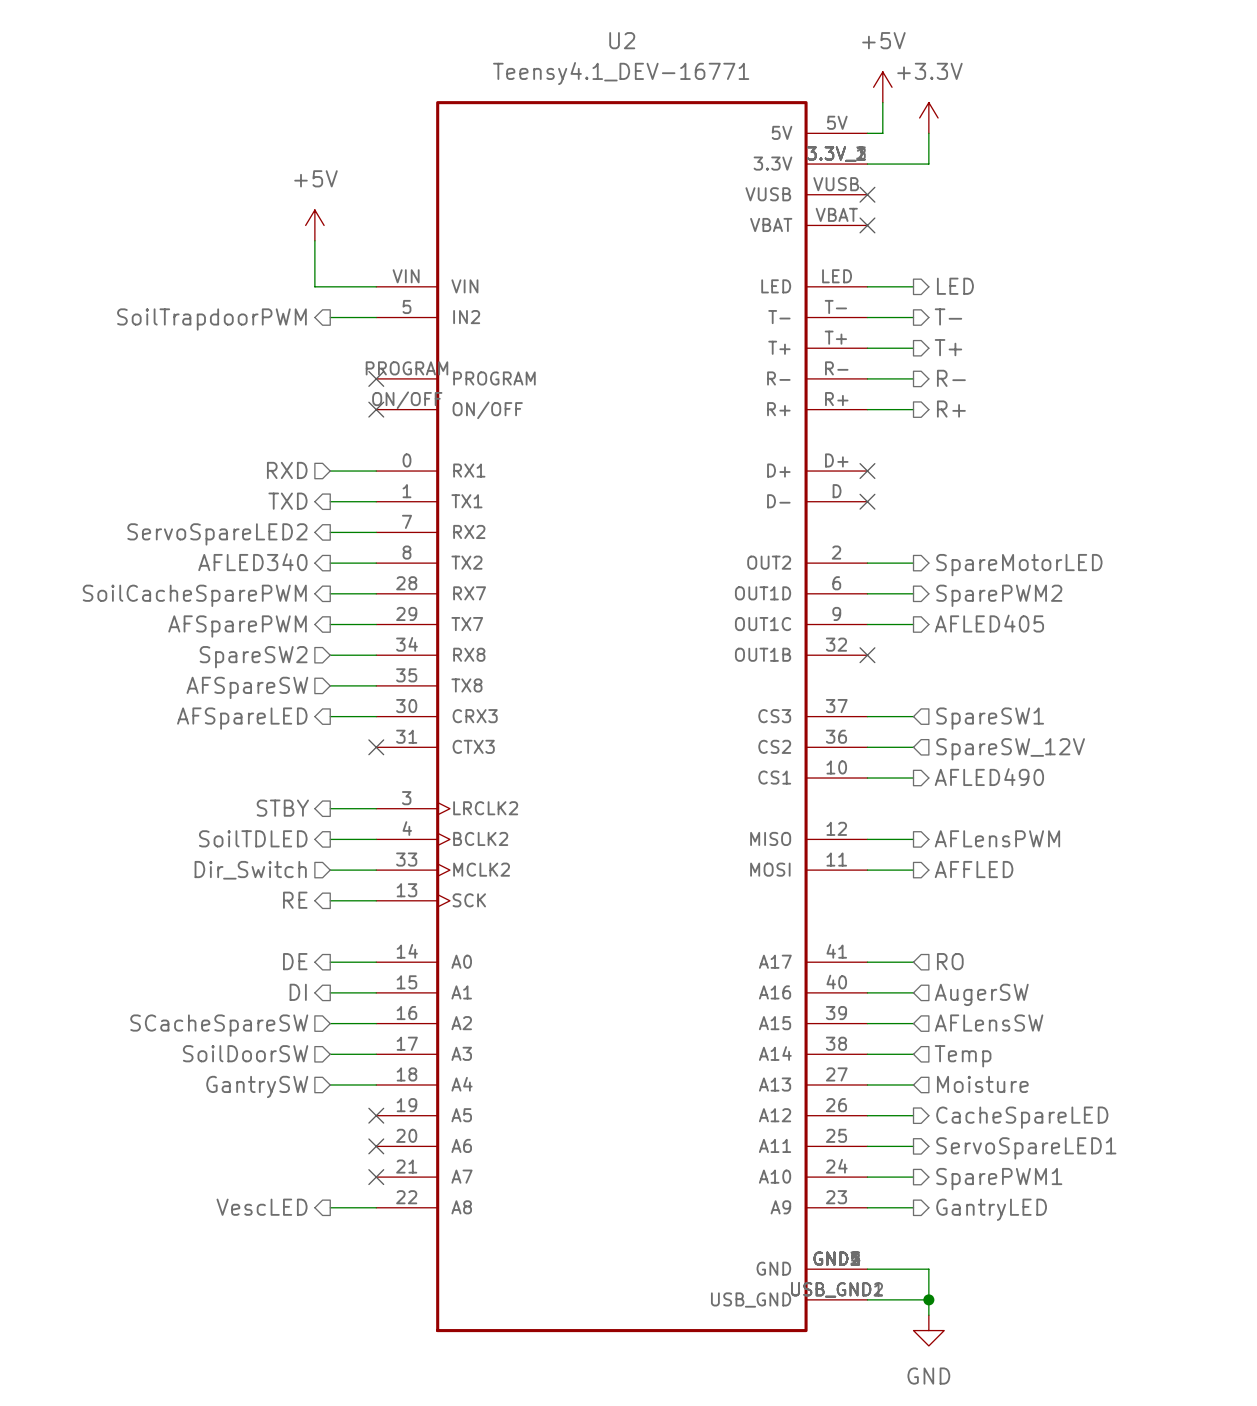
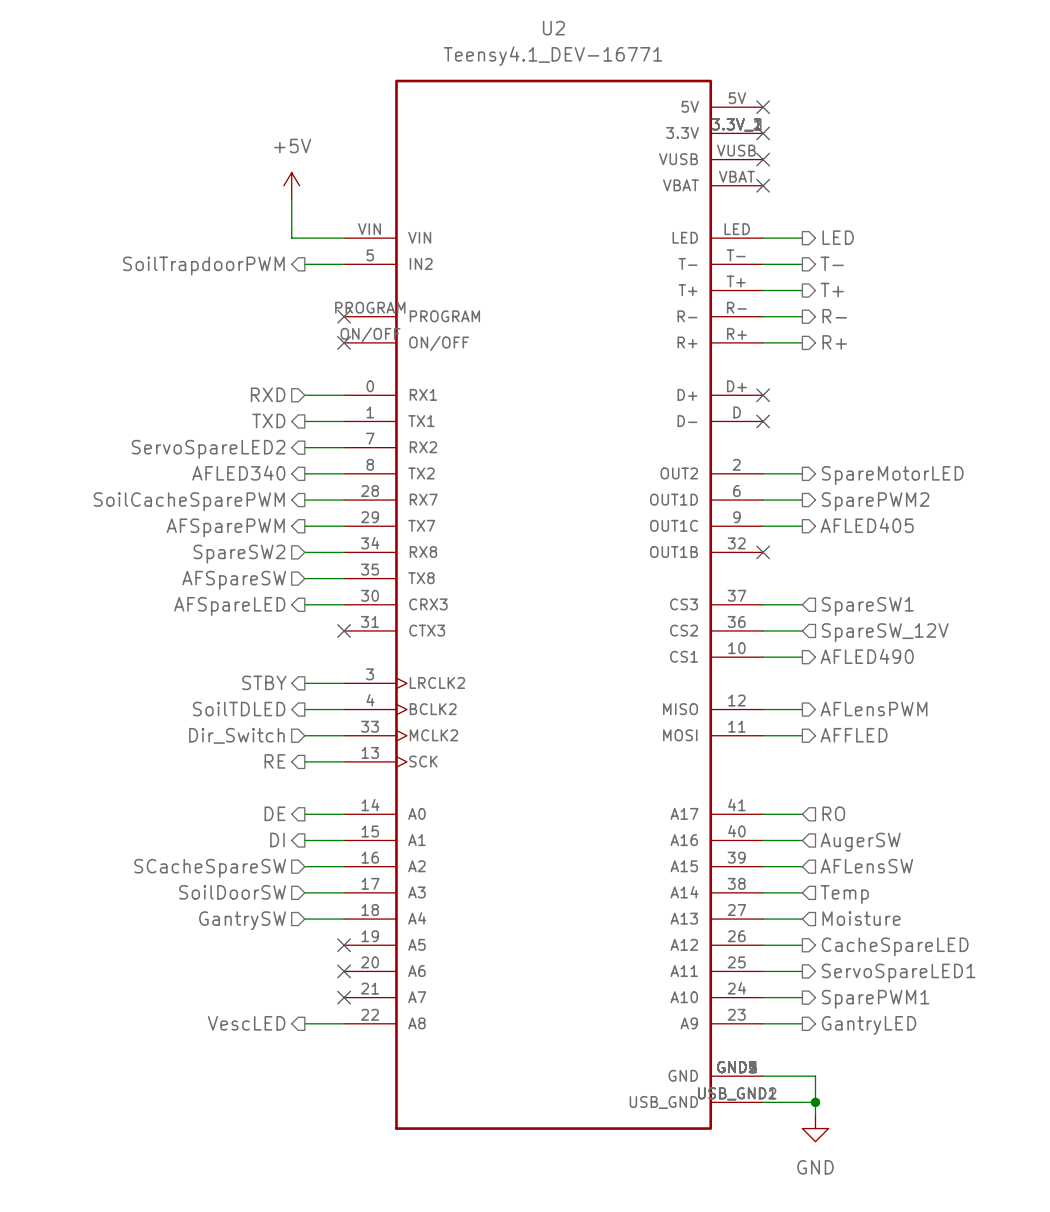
power symbol: +5V (882, 87) -> none
wire: (882, 102) (882, 133) (867, 133) -> none
power symbol: +3.3V (928, 117) -> none
no-connect mark: none -> (763, 107)
wire: (928, 133) (928, 164) (867, 164) -> none
no-connect mark: none -> (763, 133)

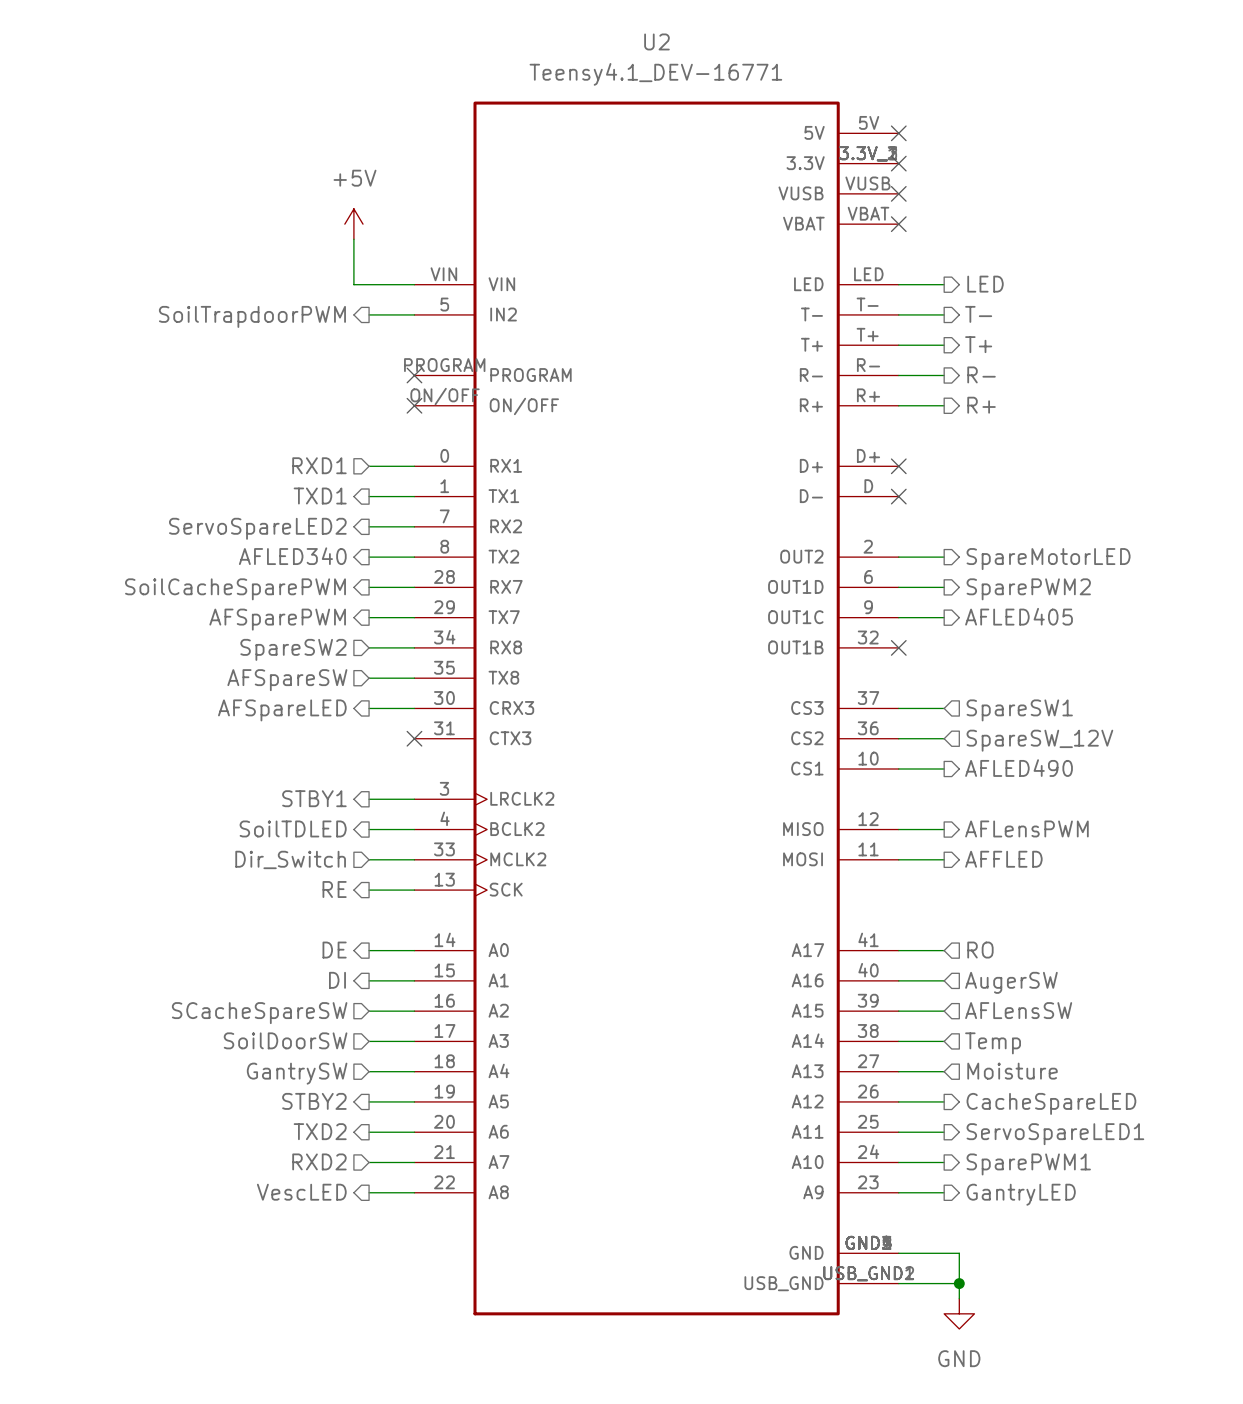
hierarchical label: RXD (268, 394) -> RXD1 (319, 465)
hierarchical label: TXD (268, 420) -> TXD1 (320, 496)
hierarchical label: STBY (264, 682) -> STBY1 (314, 798)
hierarchical label: none -> STBY2 (314, 1101)
wire: none -> (369, 1101) (414, 1101)
no-connect mark: (344, 945) -> none
hierarchical label: none -> TXD2 (320, 1131)
wire: none -> (369, 1132) (414, 1132)
no-connect mark: (344, 971) -> none
hierarchical label: none -> RXD2 (319, 1161)
wire: none -> (369, 1162) (414, 1162)
no-connect mark: (344, 997) -> none

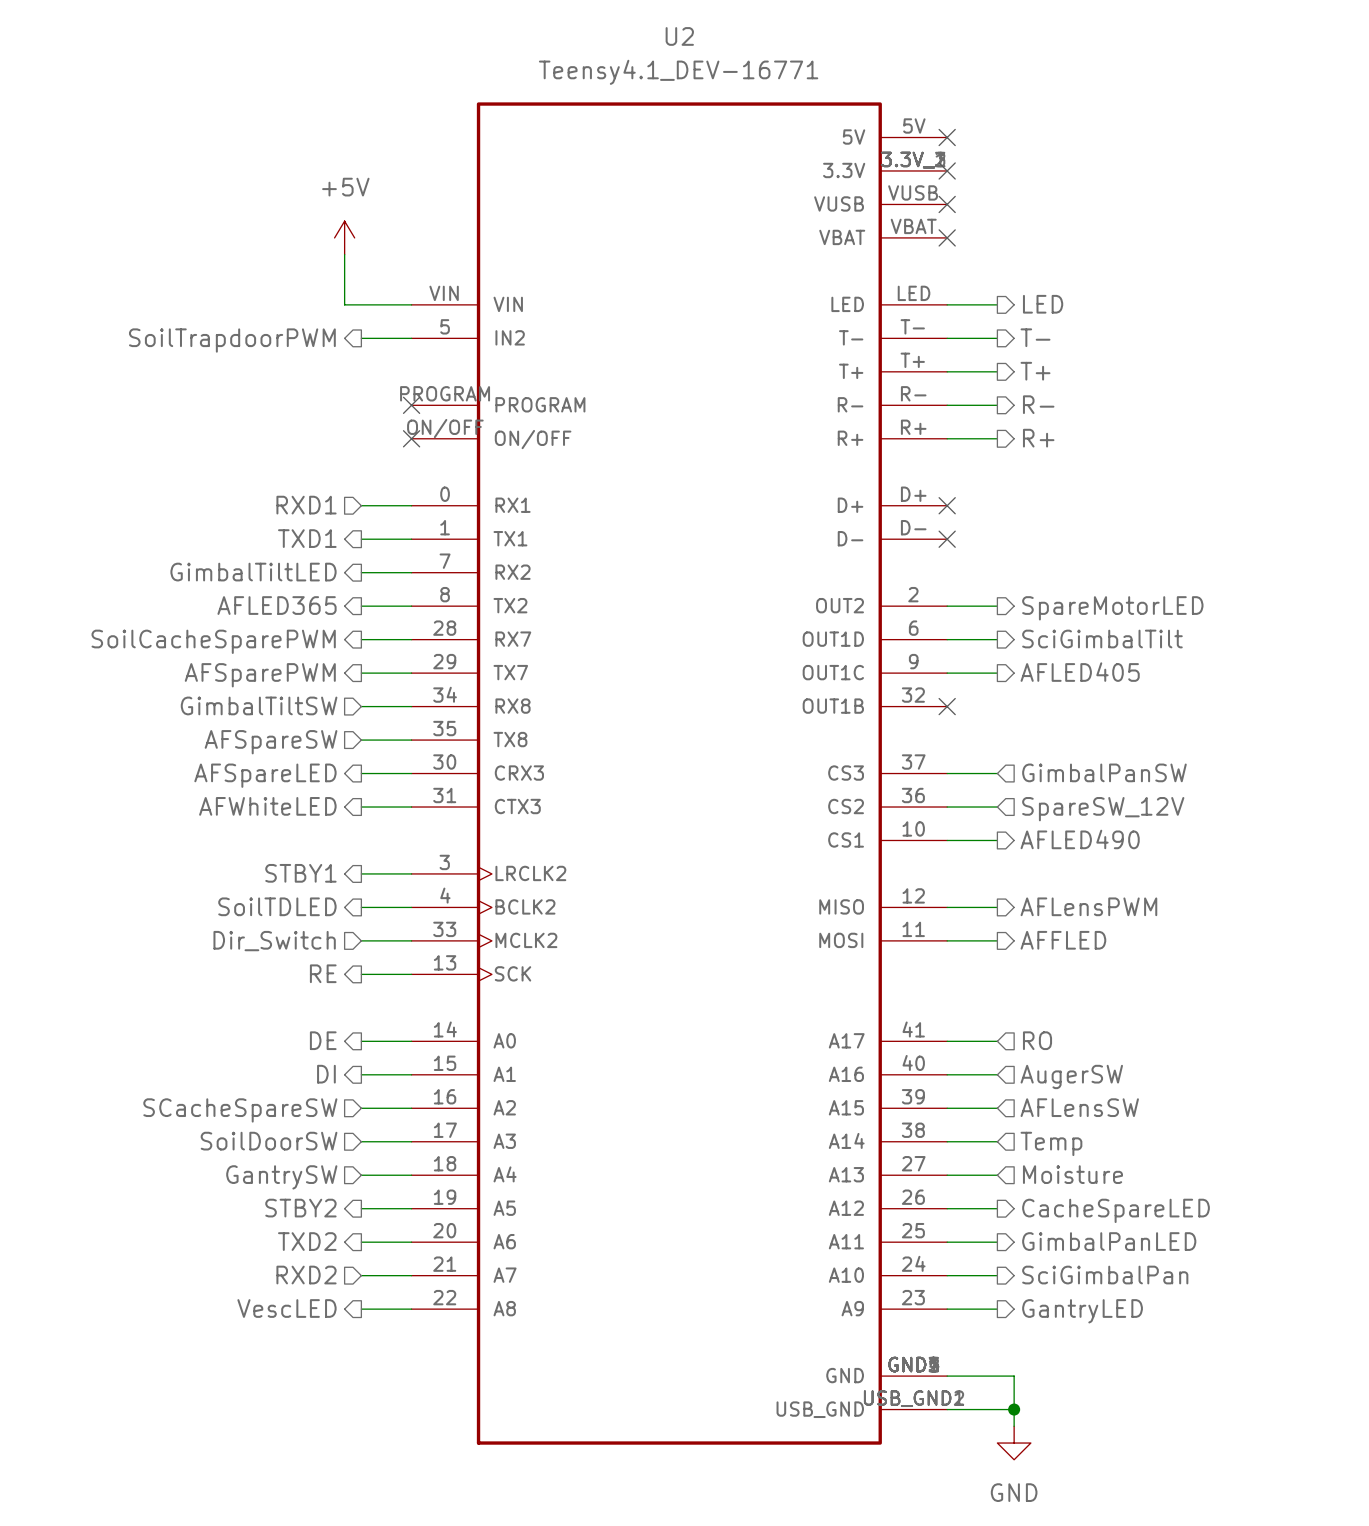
U2 pin number: D (868, 486) -> D- (913, 527)
hierarchical label: ServoSpareLED2 (257, 528) -> GimbalTiltLED (253, 572)
hierarchical label: AFLED340 (292, 556) -> AFLED365 (277, 605)
hierarchical label: SparePWM2 (1028, 589) -> SciGimbalTilt (1102, 639)
hierarchical label: SpareSW2 (293, 649) -> GimbalTiltSW (259, 705)
hierarchical label: SpareSW1 (1019, 710) -> GimbalPanSW (1104, 772)
hierarchical label: none -> AFWhiteLED (267, 806)
wire: none -> (361, 807) (411, 807)
no-connect mark: (414, 738) -> none
hierarchical label: ServoSpareLED1 (1055, 1134) -> GimbalPanLED (1109, 1241)
hierarchical label: SparePWM1 (1028, 1164) -> SciGimbalPan (1105, 1275)

